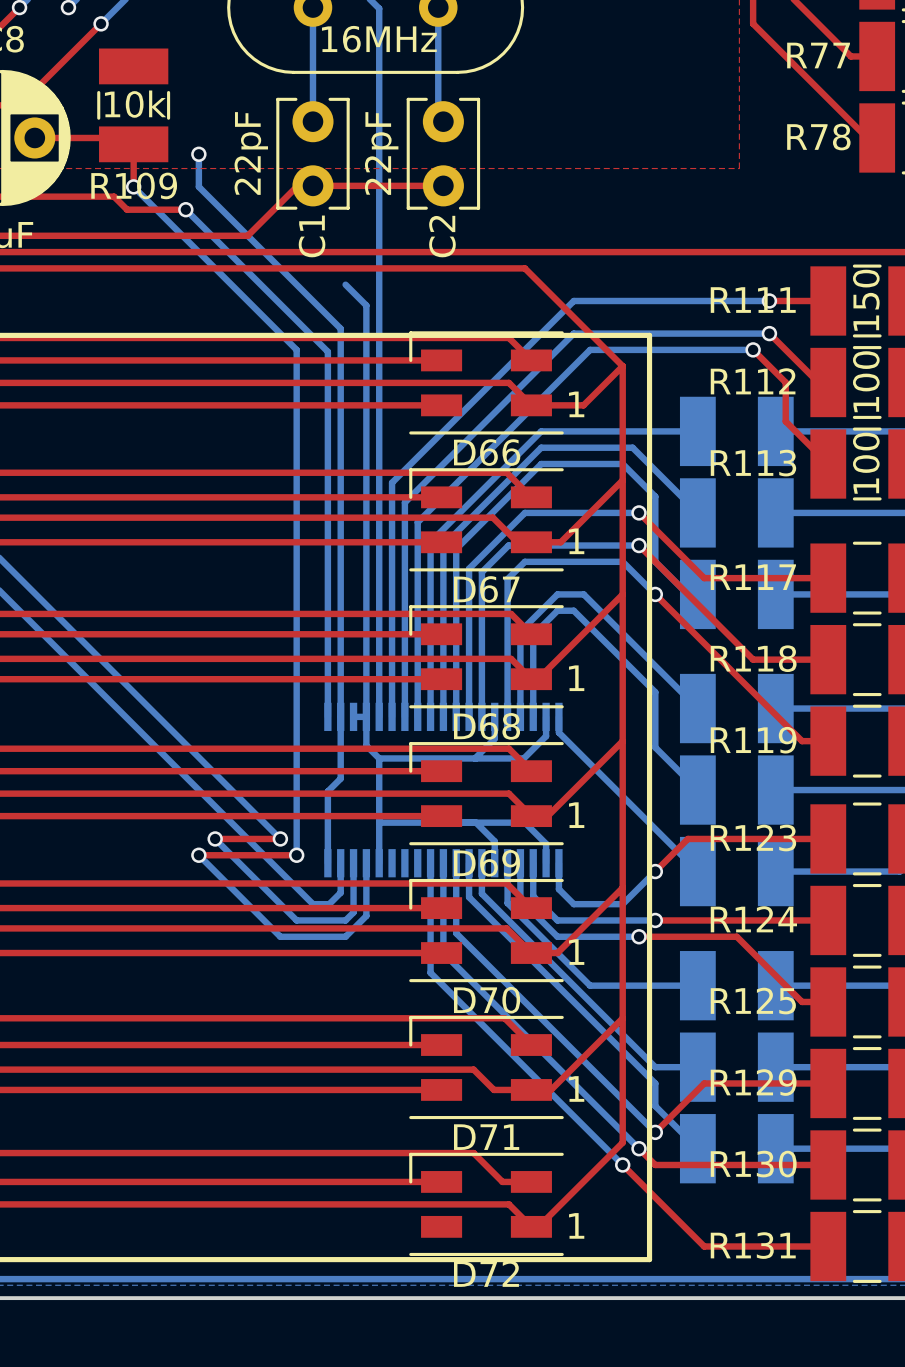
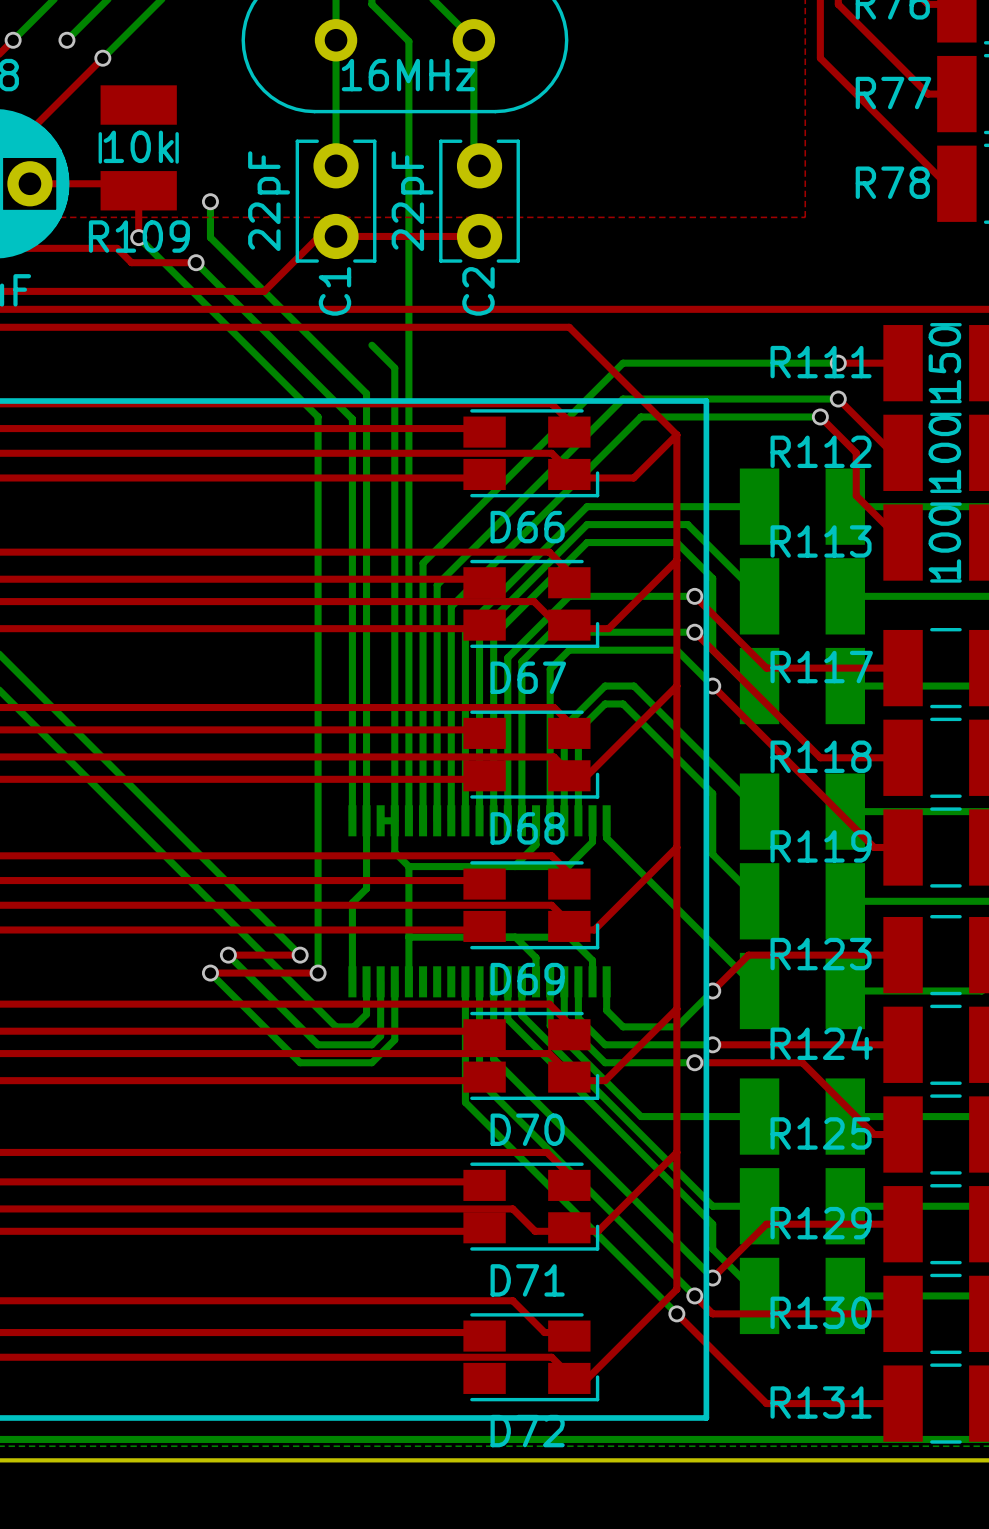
D66 footprint: [409, 331, 564, 435] -> [463, 409, 600, 498]
D67 footprint: [409, 468, 564, 572] -> [463, 559, 600, 649]
D68 footprint: [409, 605, 564, 709] -> [463, 710, 600, 799]
D69 footprint: [409, 742, 564, 846] -> [463, 861, 600, 950]
D70 footprint: [409, 878, 564, 983] -> [463, 1011, 600, 1100]
D71 footprint: [409, 1015, 564, 1120] -> [463, 1162, 600, 1251]
D72 footprint: [409, 1152, 564, 1257] -> [463, 1313, 600, 1402]

